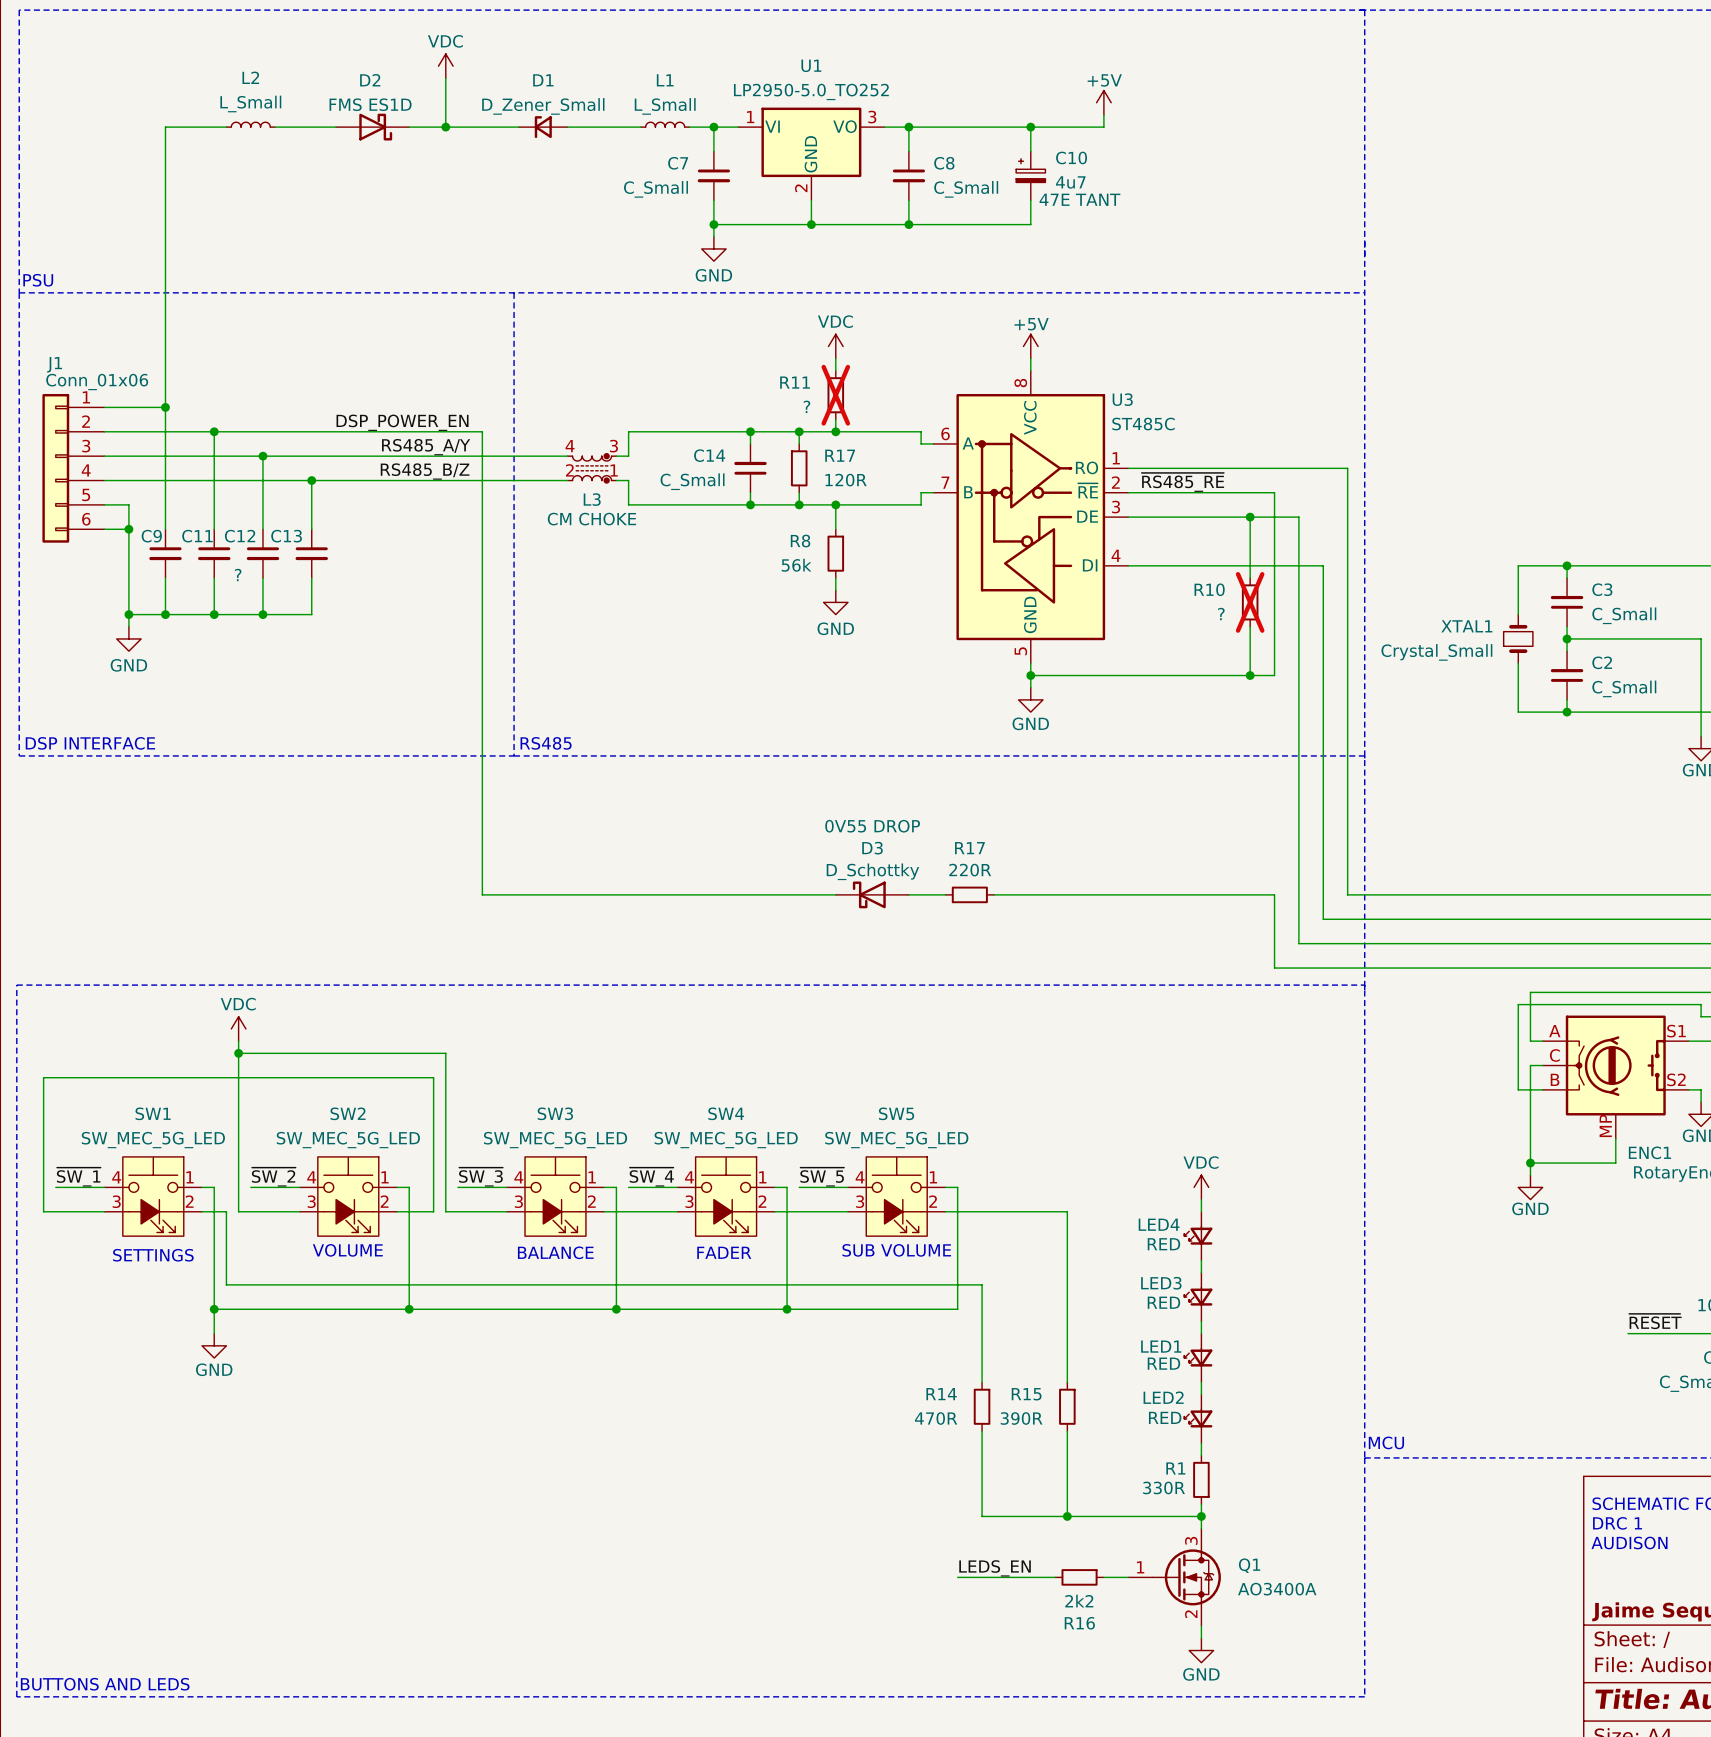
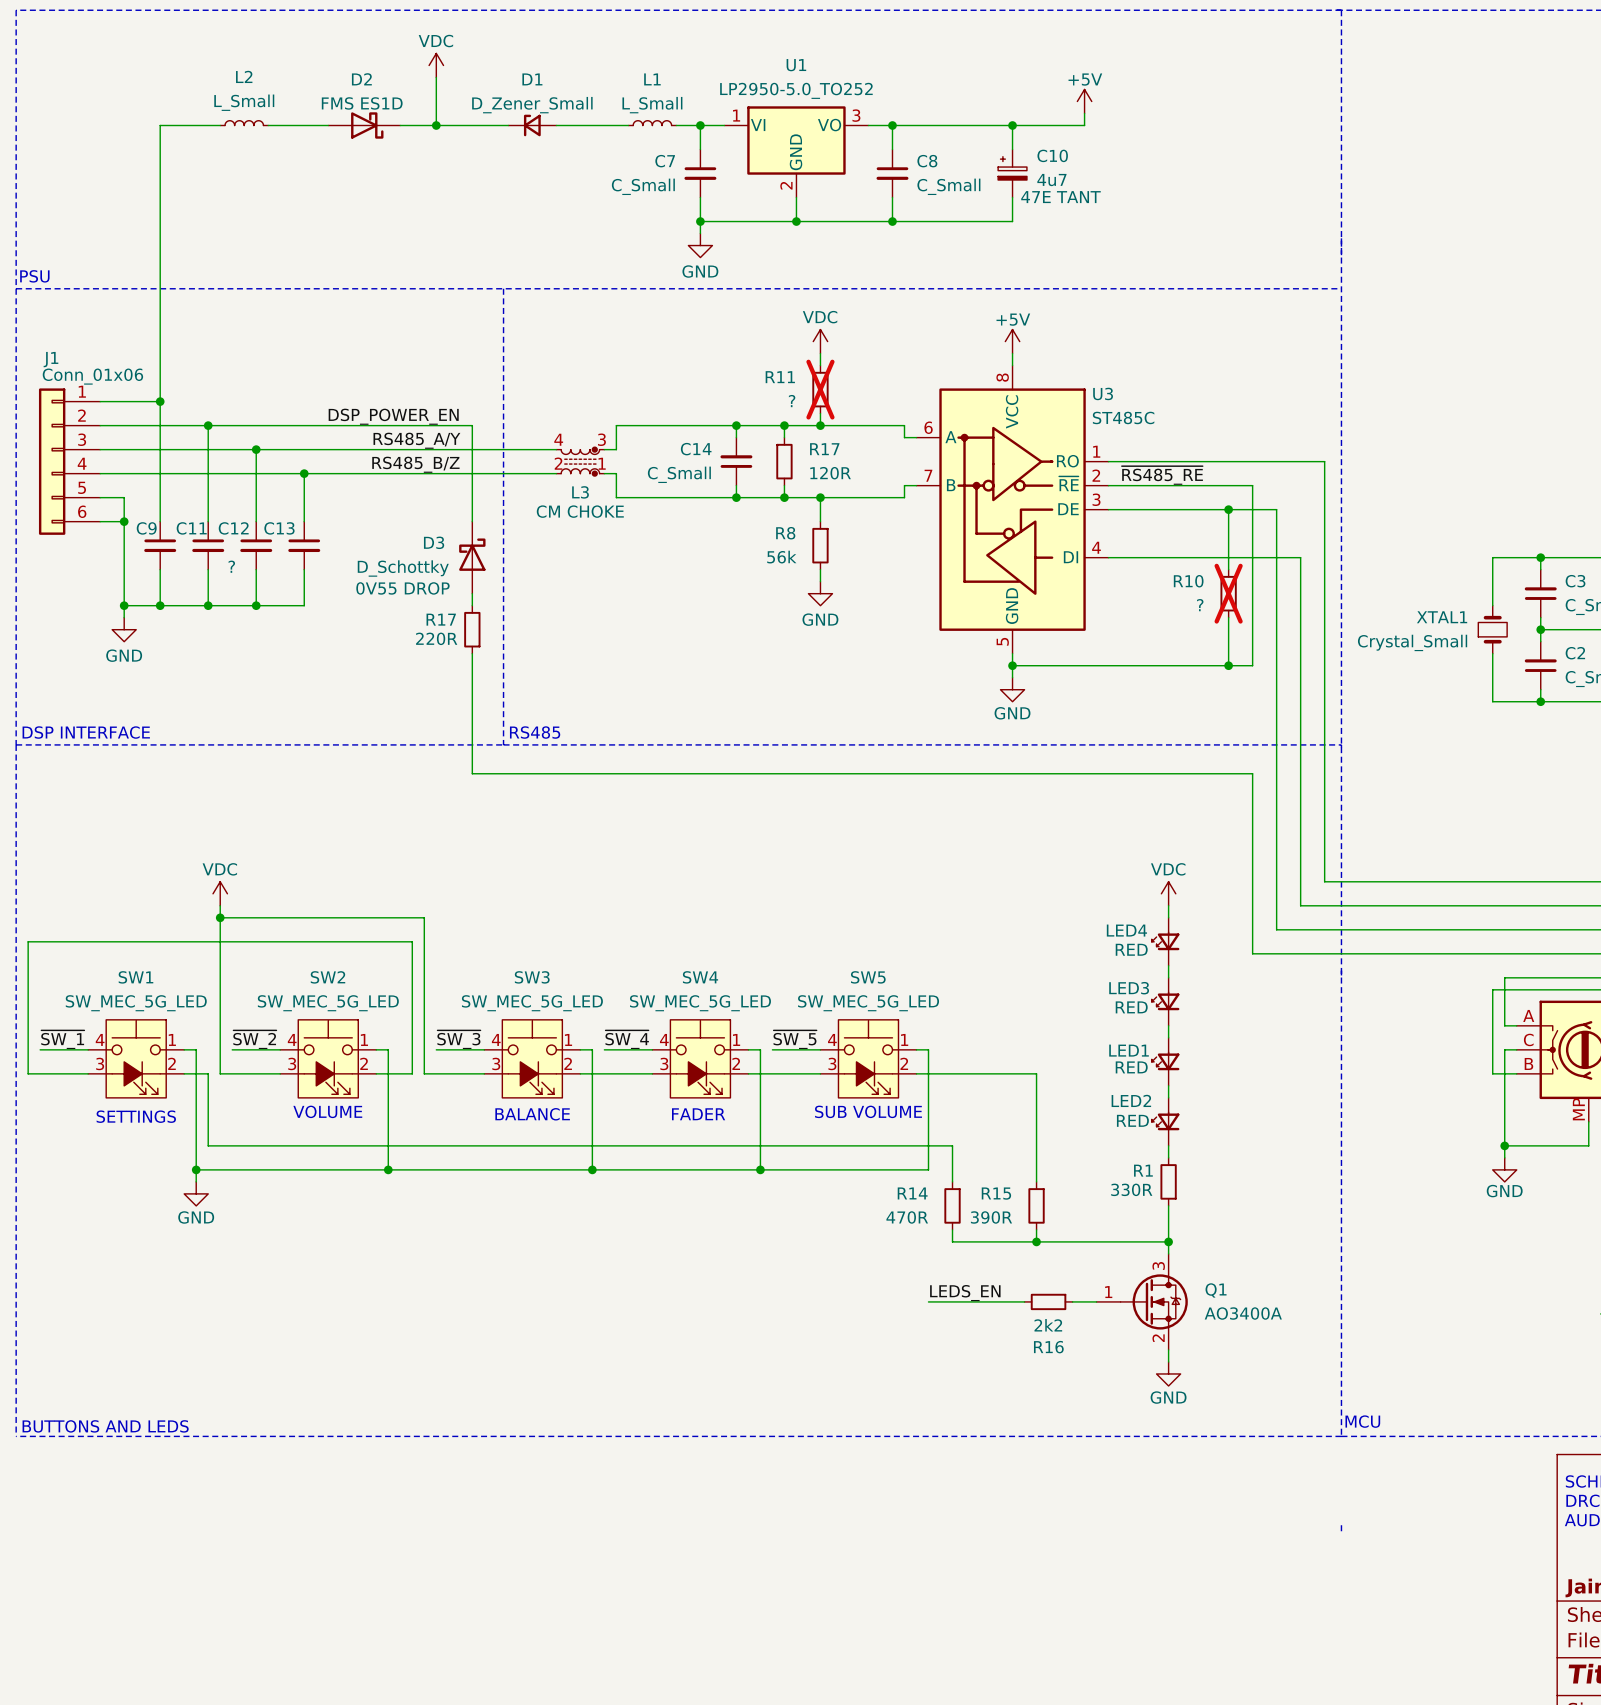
wire: (482, 614) (482, 663) -> none
R17: none -> 220R (472, 629)
wire: (482, 785) (482, 894) (835, 894) -> (472, 773) (1252, 773) (1252, 881)
D3 text position: 0V55 DROP (872, 826) -> 0V55 DROP (402, 588)
D3 name position: D3 (872, 848) -> D3 (434, 542)
D3 value position: D_Schottky (872, 871) -> D_Schottky (403, 568)
D3 rotation: 0° (869, 894) -> 90° clockwise (472, 554)
D3 position: (872, 894) -> (472, 557)
wire: (908, 894) (945, 894) -> none
R17: 220R (969, 894) -> none
wire: (994, 894) (1274, 894) -> none
power symbol: none -> VDC (1168, 893)
wire: none -> (1168, 905) (1168, 917)
junction: none -> (220, 917)
line: (1364, 985) (16, 985) (16, 1696) (1364, 1696) (1364, 1555) -> none
power symbol position: VDC (238, 1028) -> VDC (220, 893)
wire: (238, 1041) (238, 1211) (299, 1211) -> (220, 905) (220, 1073) (280, 1073)
wire: (238, 1053) (445, 1053) (445, 1211) (506, 1211) -> none
junction: (238, 1053) -> none
wire: none -> (184, 1049) (196, 1049) (196, 1181)
wire: none -> (232, 1049) (280, 1049)
wire: none -> (376, 1049) (388, 1049) (388, 1169) (292, 1169)
wire: none -> (436, 1049) (484, 1049)
wire: none -> (580, 1049) (592, 1049) (592, 1169) (496, 1169)
wire: none -> (604, 1049) (652, 1049)
wire: none -> (748, 1049) (760, 1049) (760, 1169) (664, 1169)
wire: none -> (772, 1049) (820, 1049)
wire: none -> (916, 1049) (928, 1049) (928, 1169) (832, 1169)
wire: (433, 1077) (43, 1077) (43, 1211) (104, 1211) -> (424, 1061) (424, 917) (220, 917)
wire: none -> (88, 1073) (28, 1073) (28, 941) (412, 941) (412, 1073) (376, 1073)
wire: none -> (184, 1073) (208, 1073) (208, 1145) (952, 1145) (952, 1181)
wire: (433, 1089) (433, 1211) (397, 1211) -> (424, 1073) (484, 1073)
wire: none -> (916, 1073) (1036, 1073) (1036, 1181)
label position: ~{SW_1} (78, 1177) -> ~{SW_1} (62, 1039)
label position: ~{SW_2} (273, 1177) -> ~{SW_2} (254, 1039)
label position: ~{SW_3} (480, 1177) -> ~{SW_3} (458, 1039)
label position: ~{SW_4} (651, 1177) -> ~{SW_4} (627, 1039)
label position: ~{SW_5} (822, 1177) -> ~{SW_5} (795, 1039)
wire: (55, 1187) (104, 1187) -> (40, 1049) (88, 1049)
junction: none -> (196, 1169)
wire: (214, 1187) (214, 1333) -> (208, 1169) (244, 1169)
junction: none -> (388, 1169)
wire: (409, 1187) (409, 1309) -> (400, 1169) (448, 1169)
junction: none -> (592, 1169)
wire: (616, 1187) (616, 1309) -> (604, 1169) (616, 1169)
junction: none -> (760, 1169)
wire: (787, 1187) (787, 1309) -> (772, 1169) (784, 1169)
wire: (945, 1187) (957, 1187) (957, 1309) (214, 1309) -> none
power symbol: VDC (1201, 1187) -> none
SW1 position: (153, 1196) -> (136, 1058)
SW2 position: (348, 1196) -> (328, 1058)
SW3 position: (555, 1196) -> (532, 1058)
SW4 position: (726, 1196) -> (700, 1058)
SW5 position: (896, 1196) -> (868, 1058)
wire: (1201, 1199) (1201, 1211) -> (1168, 965) (1168, 977)
wire: (202, 1211) (226, 1211) (226, 1284) (982, 1284) (982, 1382) -> none
wire: (604, 1211) (677, 1211) -> (580, 1073) (652, 1073)
wire: (774, 1211) (847, 1211) -> (748, 1073) (820, 1073)
wire: (945, 1211) (1067, 1211) (1067, 1382) -> none
wire: none -> (1168, 1205) (1168, 1253)
LED4 position: (1198, 1236) -> (1165, 941)
wire: none -> (952, 1229) (952, 1241) (1168, 1241)
wire: none -> (1036, 1229) (1036, 1241)
text position: VOLUME (347, 1250) -> VOLUME (327, 1111)
text position: SUB VOLUME (896, 1250) -> SUB VOLUME (868, 1111)
text position: BALANCE (555, 1252) -> BALANCE (532, 1114)
text position: FADER (724, 1252) -> FADER (698, 1114)
text position: SETTINGS (153, 1255) -> SETTINGS (136, 1116)
junction: none -> (1036, 1241)
junction: none -> (1168, 1241)
wire: (1201, 1260) (1201, 1272) -> (1168, 1025) (1168, 1037)
LED3 position: (1198, 1297) -> (1165, 1001)
junction: (214, 1309) -> none
junction: (409, 1309) -> none
junction: (616, 1309) -> none
junction: (787, 1309) -> none
label: none -> LEDS_EN (965, 1293)
wire: none -> (928, 1301) (1024, 1301)
wire: none -> (1072, 1301) (1096, 1301)
wire: (1201, 1321) (1201, 1333) -> (1168, 1085) (1168, 1097)
power symbol position: GND (214, 1345) -> GND (196, 1193)
LED1 position: (1198, 1358) -> (1165, 1061)
wire: (1201, 1382) (1201, 1394) -> (1168, 1145) (1168, 1157)
power symbol: none -> GND (1168, 1373)
R14 position: (982, 1406) -> (952, 1205)
R15 position: (1067, 1406) -> (1036, 1205)
LED2 position: (1198, 1418) -> (1165, 1121)
wire: (982, 1431) (982, 1516) (1201, 1516) -> none
wire: (1067, 1431) (1067, 1516) -> none
wire: (1201, 1443) (1201, 1455) -> (1168, 1349) (1168, 1361)
line: (1364, 1457) (1364, 1548) -> (1341, 1436) (16, 1436) (16, 744)
R1 position: (1201, 1479) -> (1168, 1181)
wire: (1201, 1504) (1201, 1528) -> none
junction: (1067, 1516) -> none
junction: (1201, 1516) -> none
label: LEDS_EN (995, 1568) -> none
wire: (957, 1577) (1055, 1577) -> none
R16 position: (1079, 1577) -> (1048, 1301)
wire: (1103, 1577) (1128, 1577) -> none
Q1 position: (1174, 1577) -> (1142, 1301)
wire: (1201, 1626) (1201, 1638) -> none
power symbol: GND (1201, 1650) -> none
text position: BUTTONS AND LEDS (105, 1684) -> BUTTONS AND LEDS (105, 1426)

